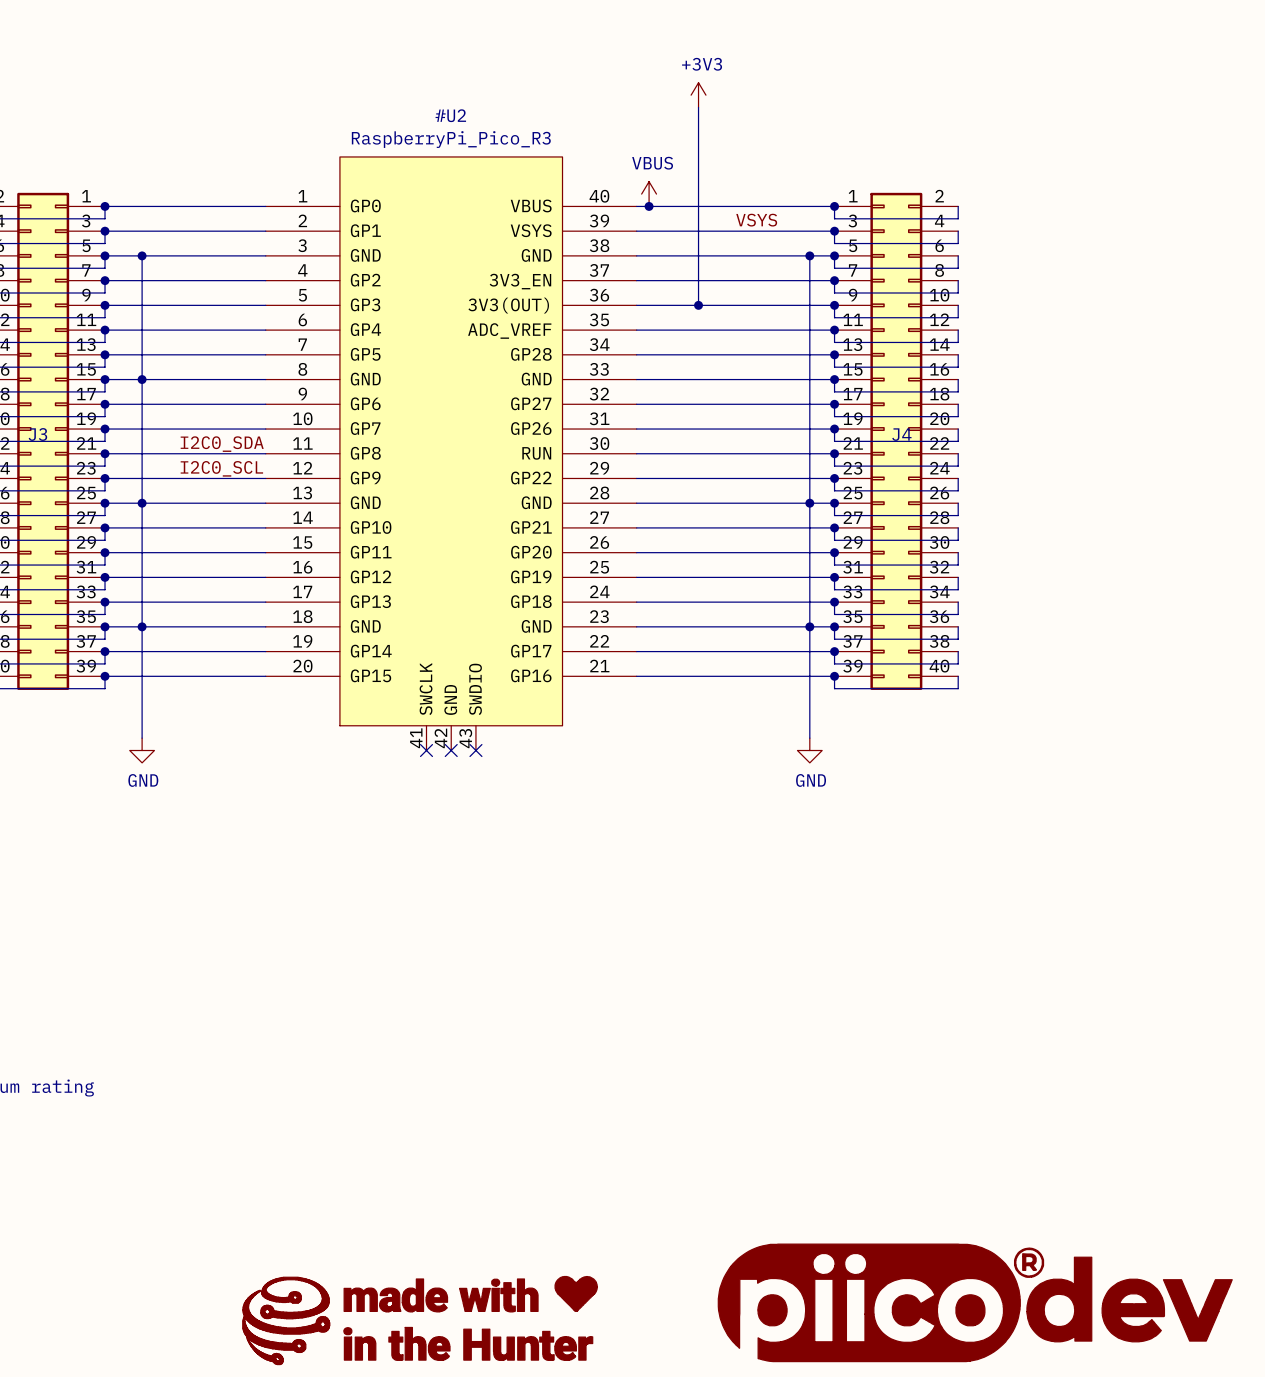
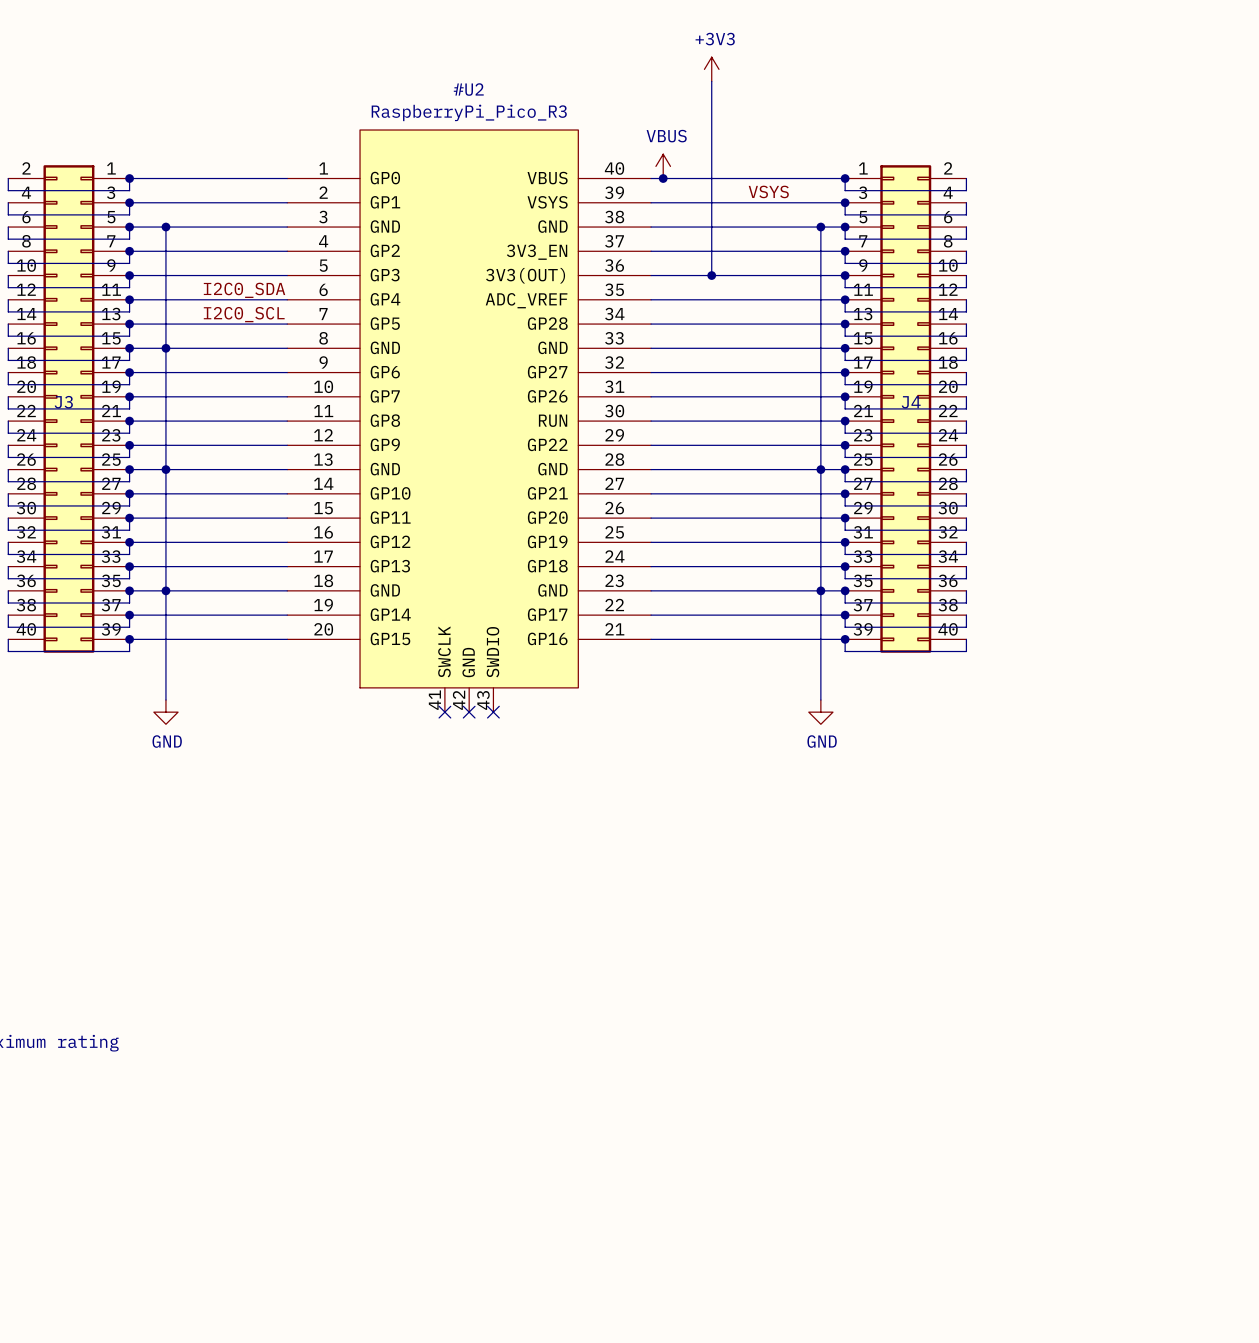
label position: I2C0_SDA (222, 444) -> I2C0_SDA (244, 290)
label position: I2C0_SCL (221, 468) -> I2C0_SCL (244, 314)
part: (975, 1302) -> none
part: (420, 1320) -> none

